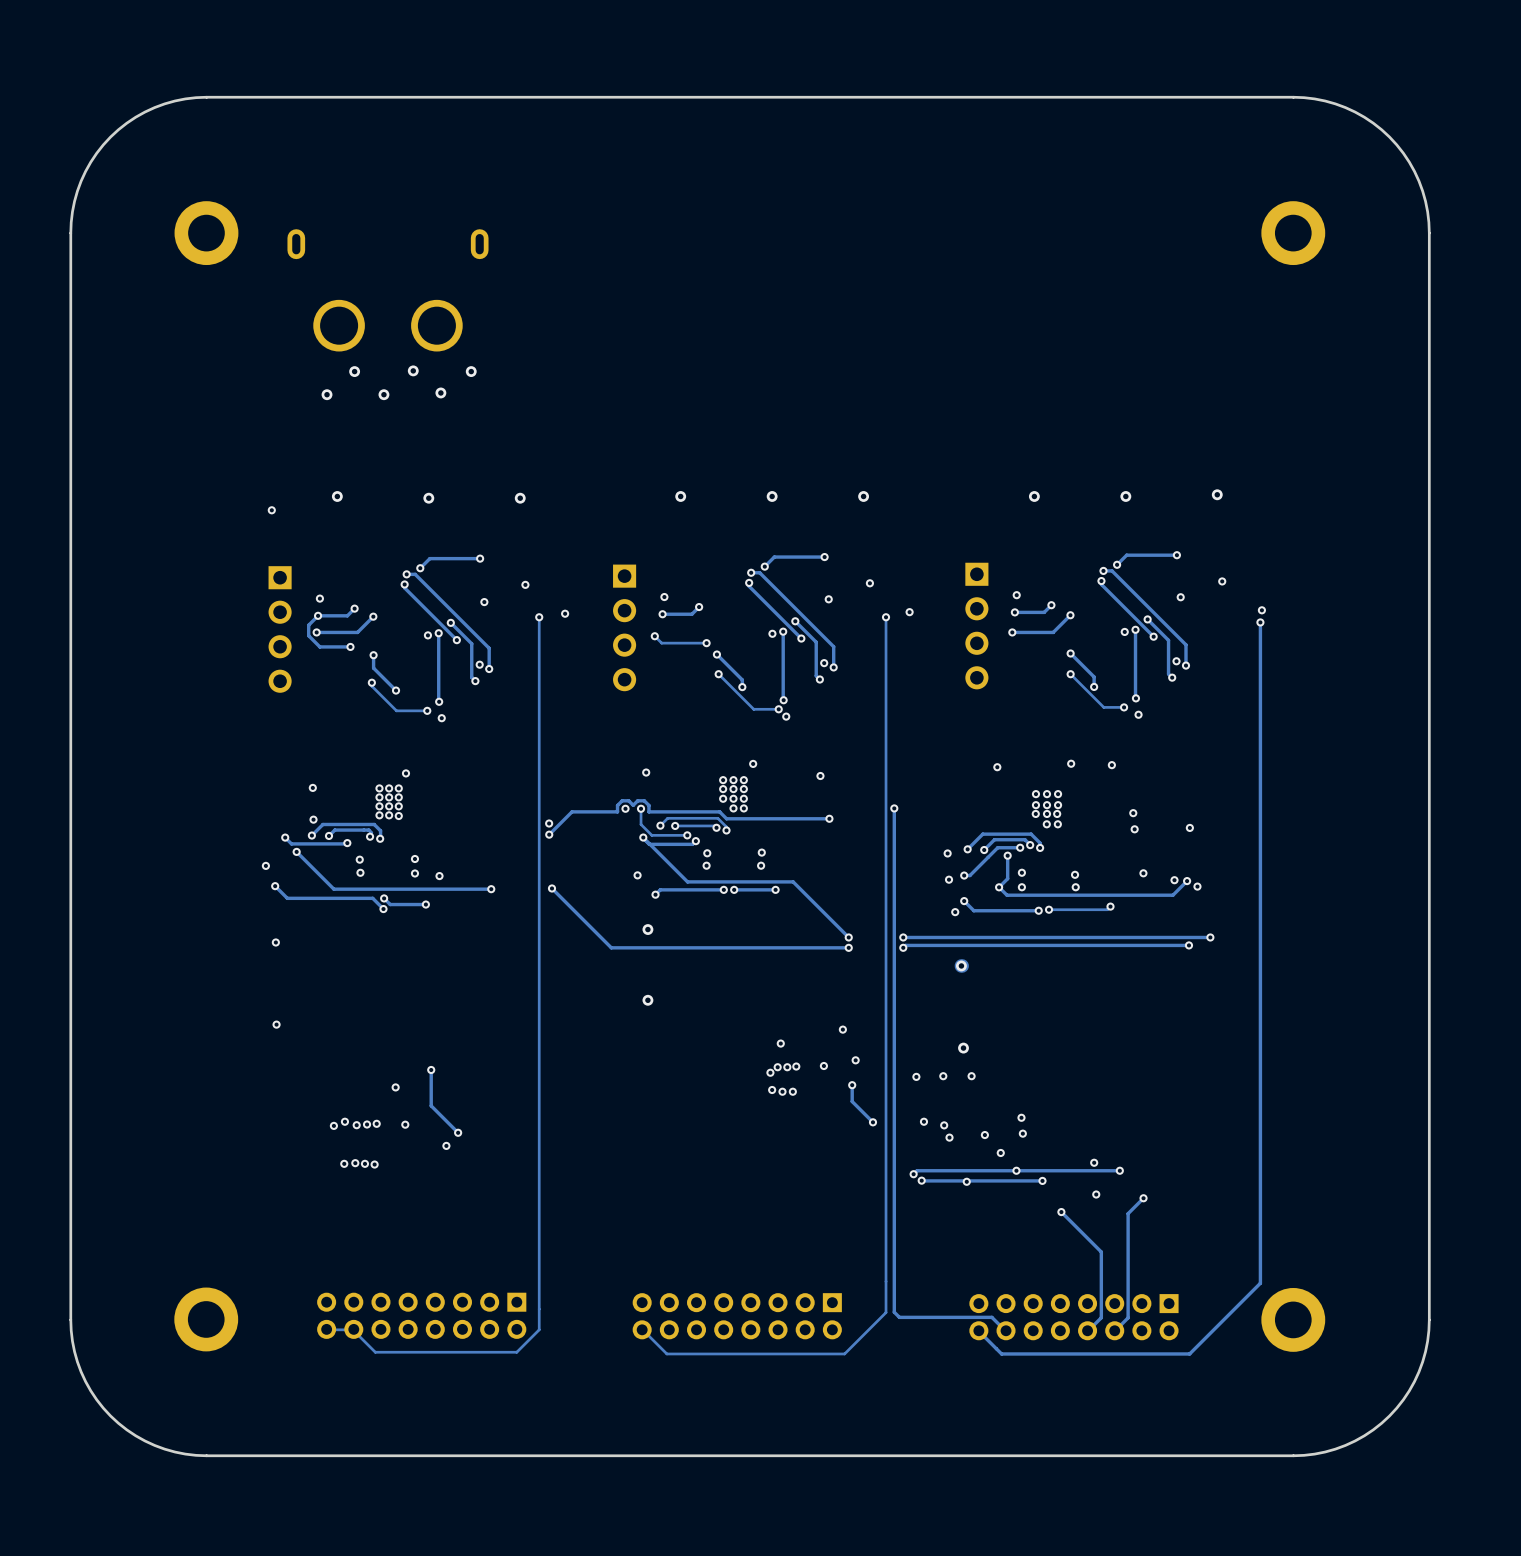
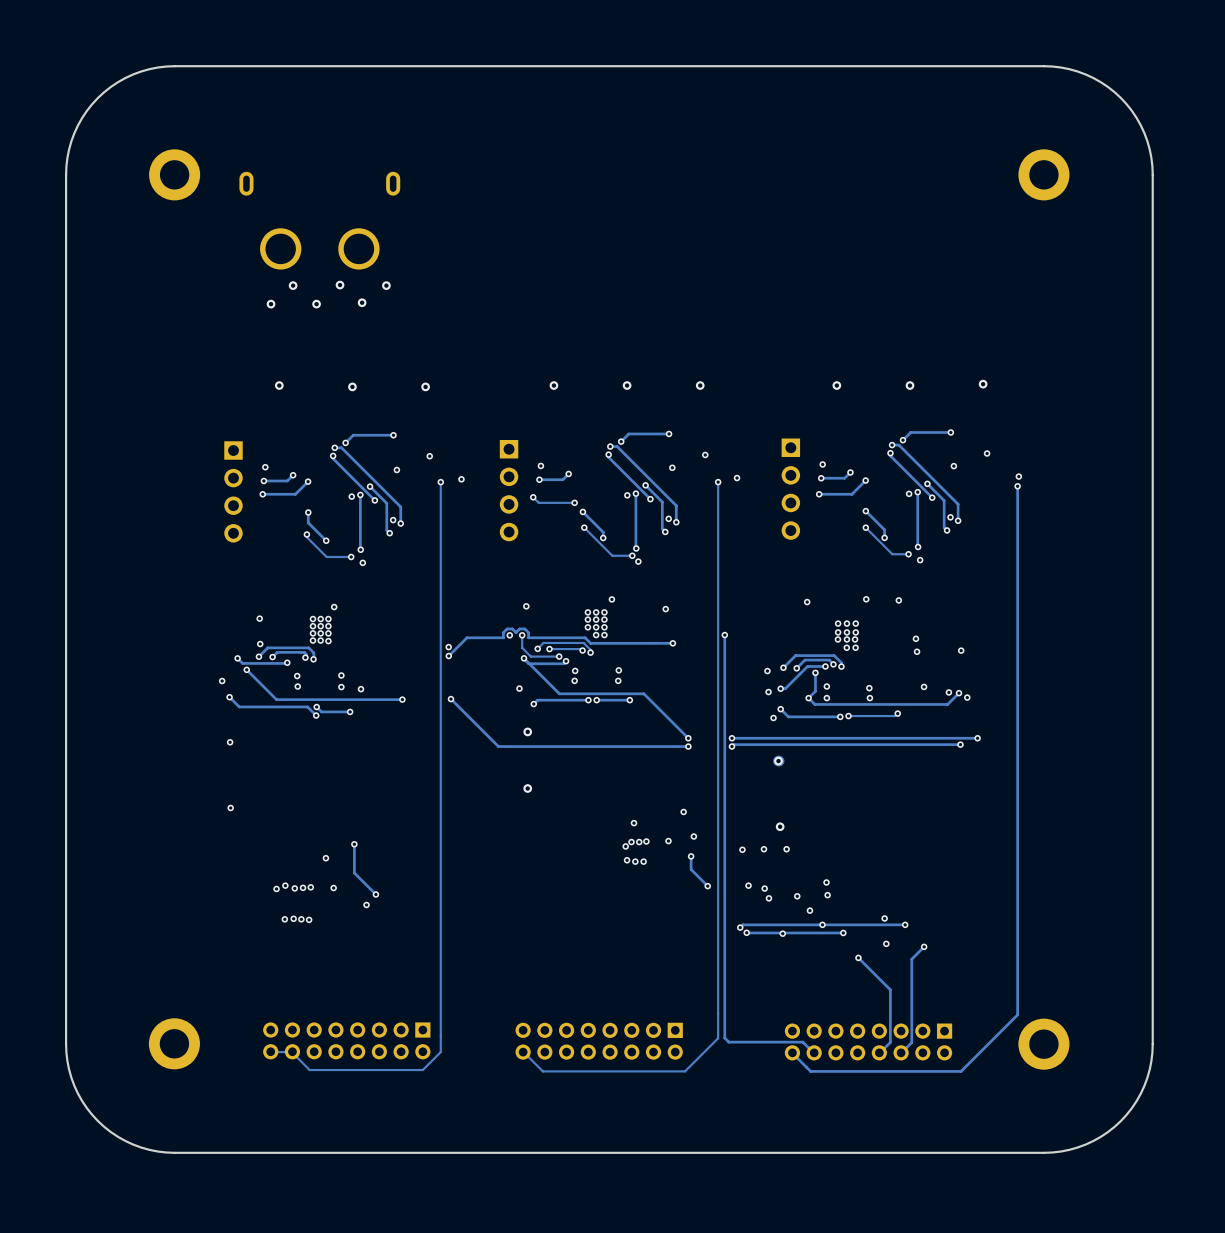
via: (271, 510) -> none
track: (318, 615) (308, 625) (308, 635) (319, 646) (350, 646) -> none
via: (350, 646) -> none

